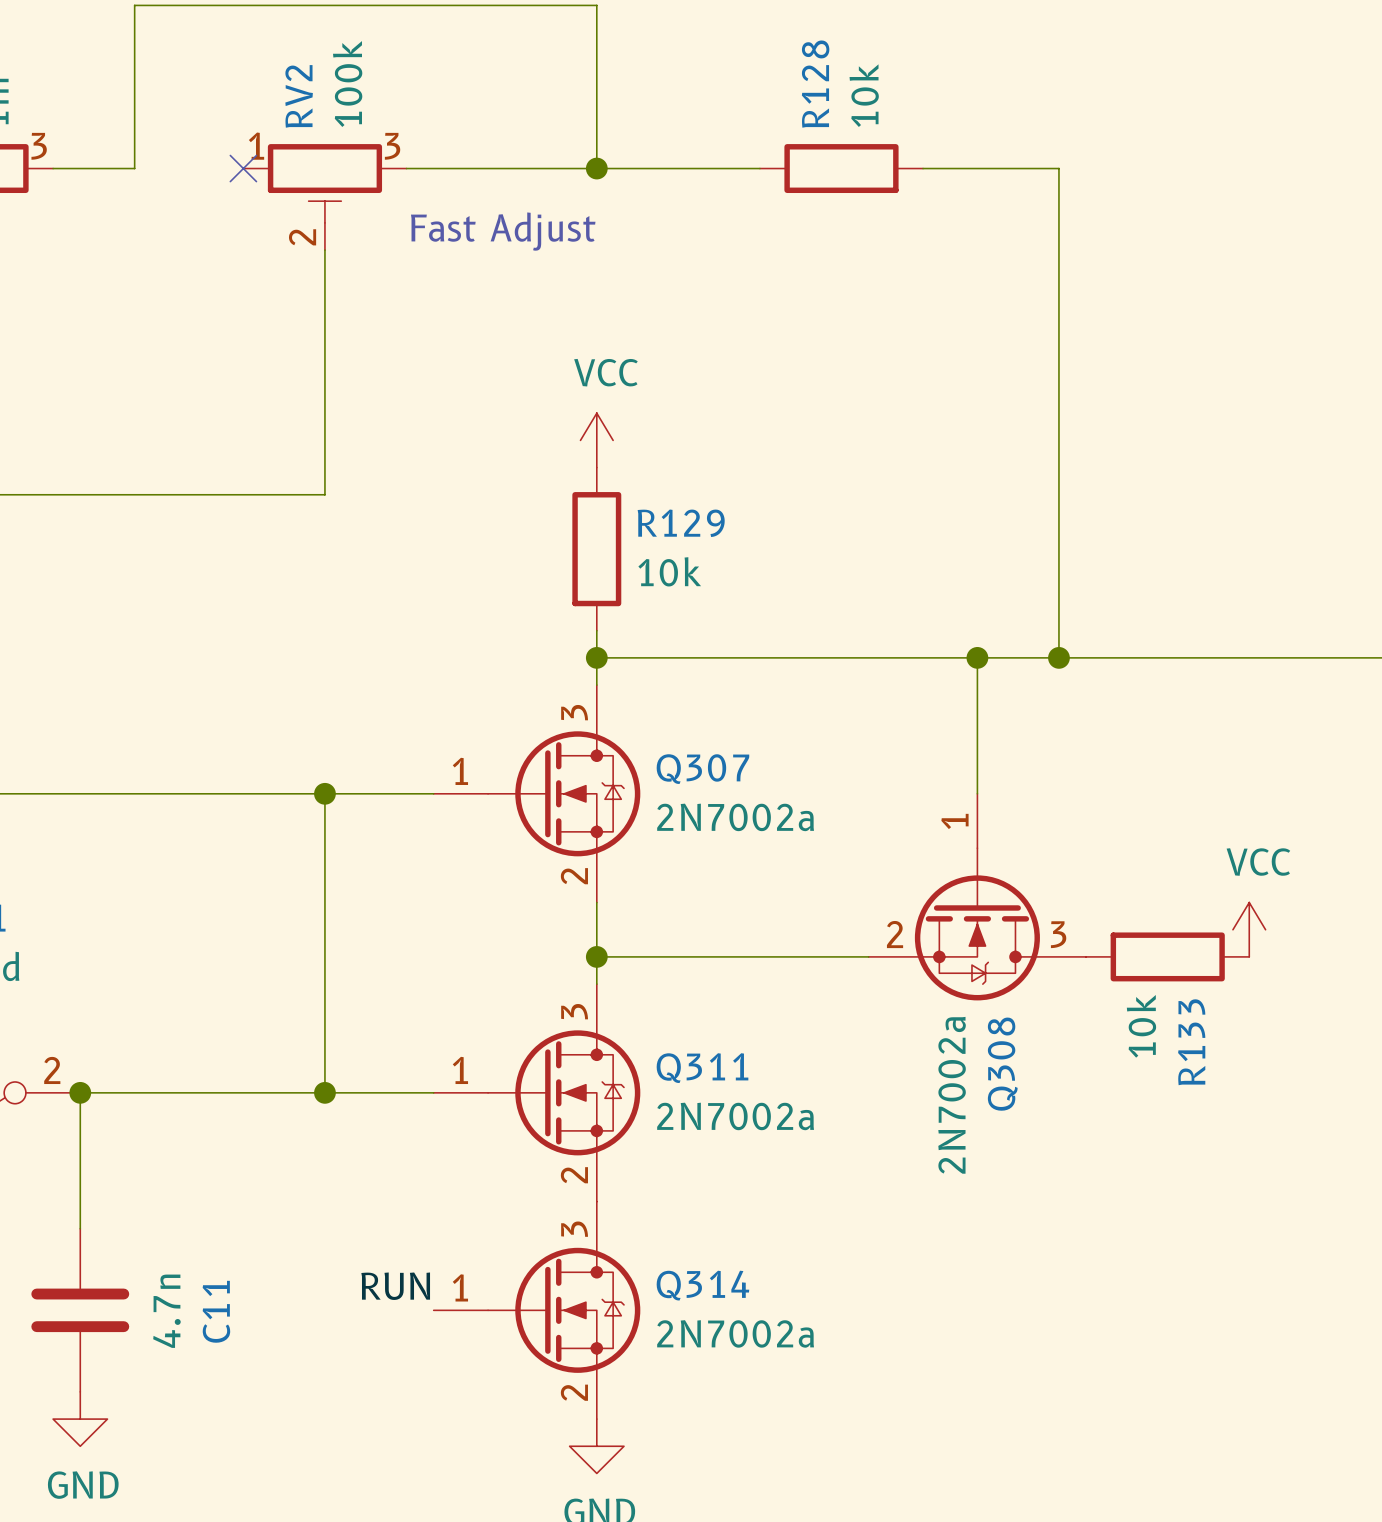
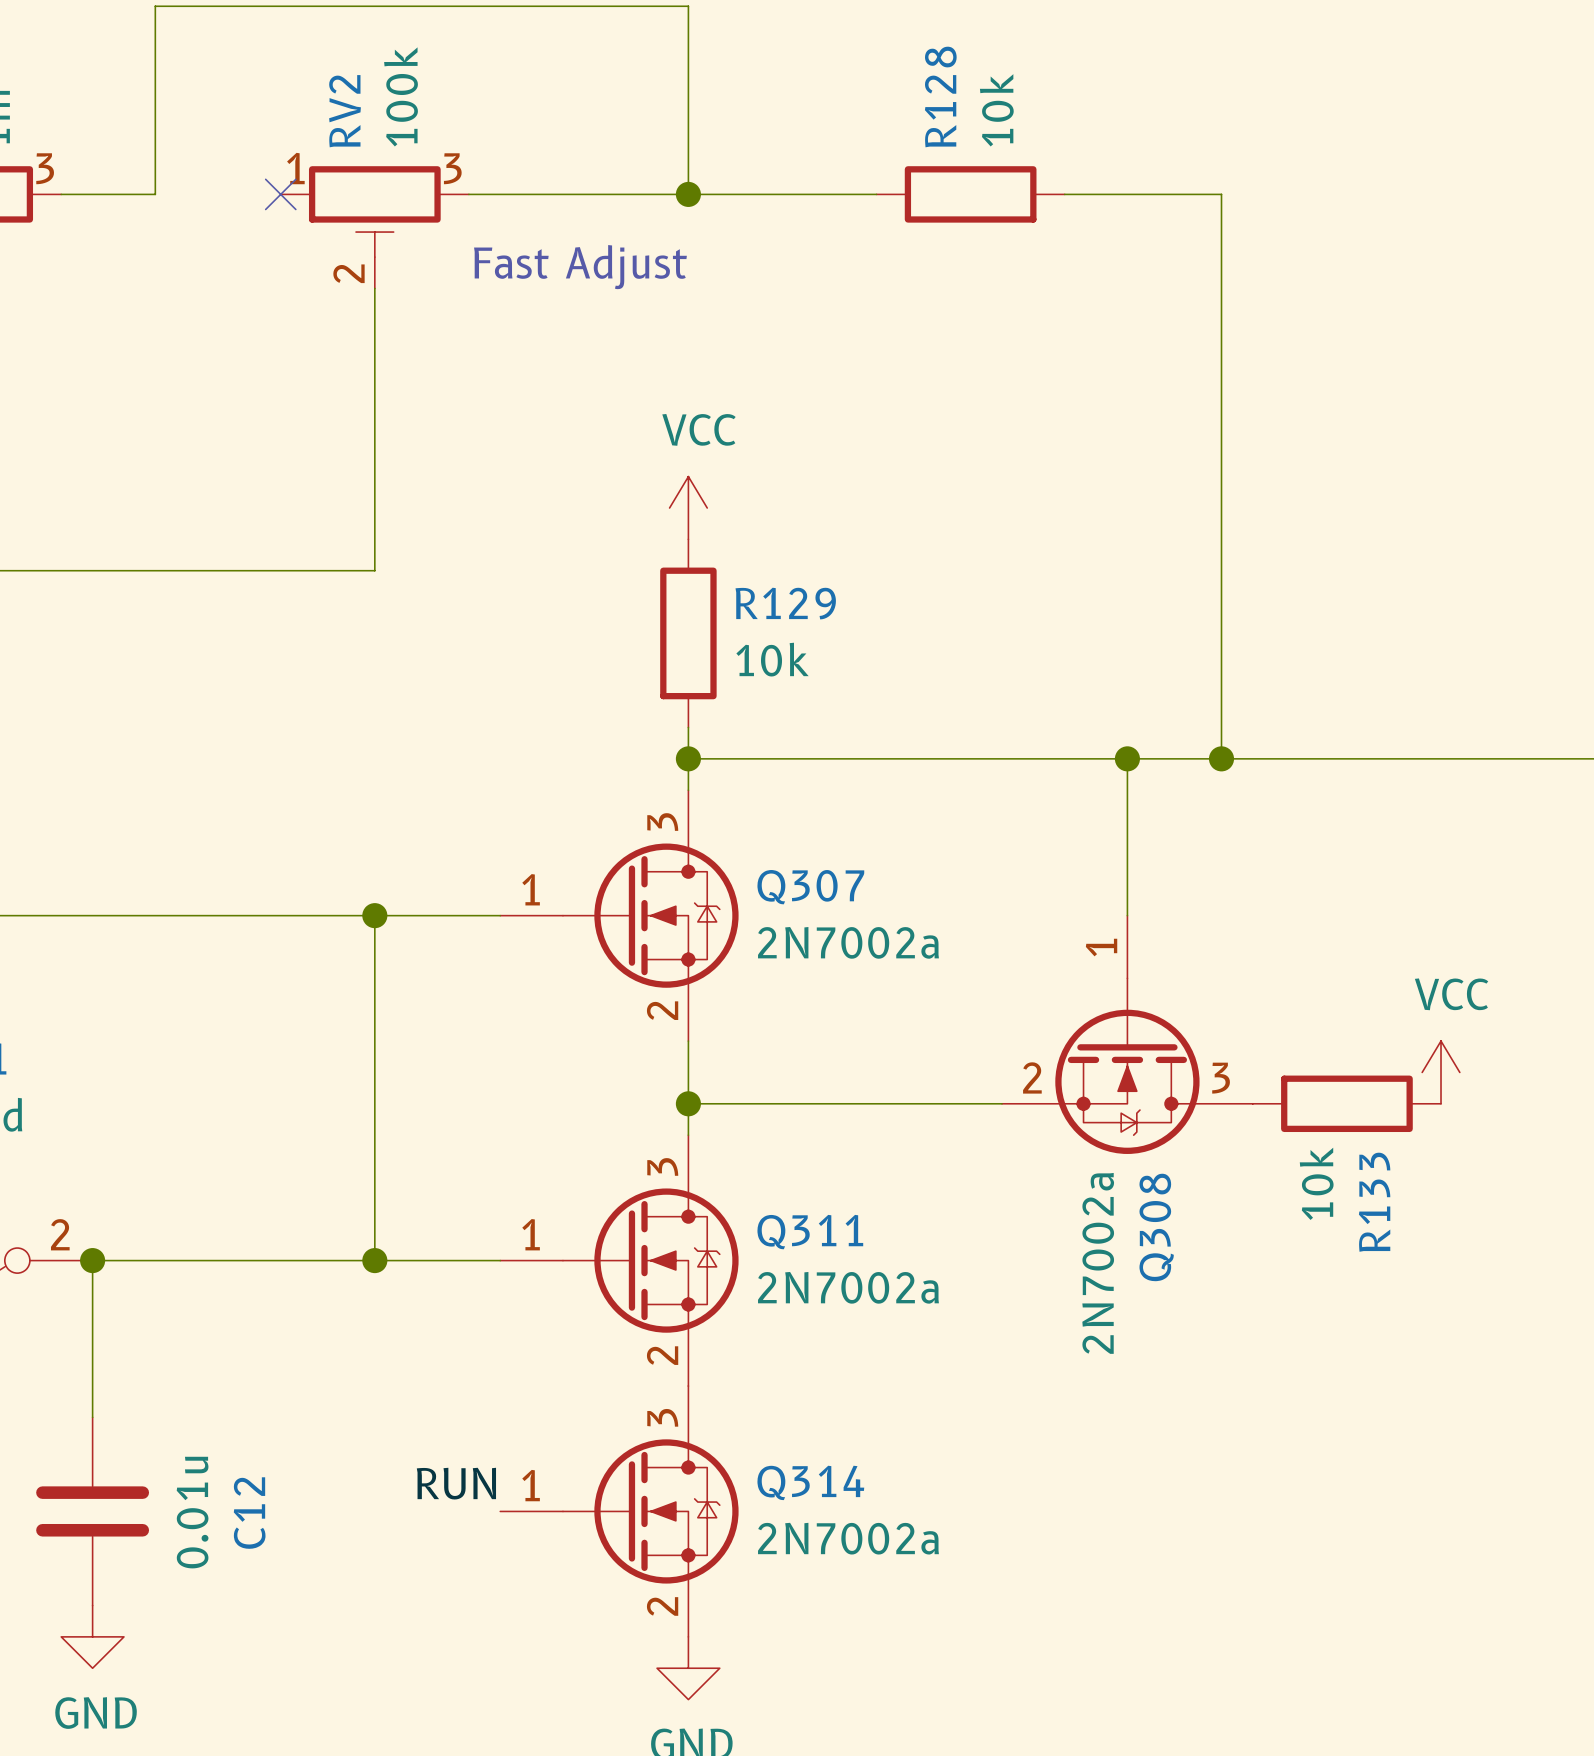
C11 value: 4.7n (166, 1311) -> 0.01u (192, 1512)
C11 name: C11 (216, 1311) -> C12 (249, 1513)

